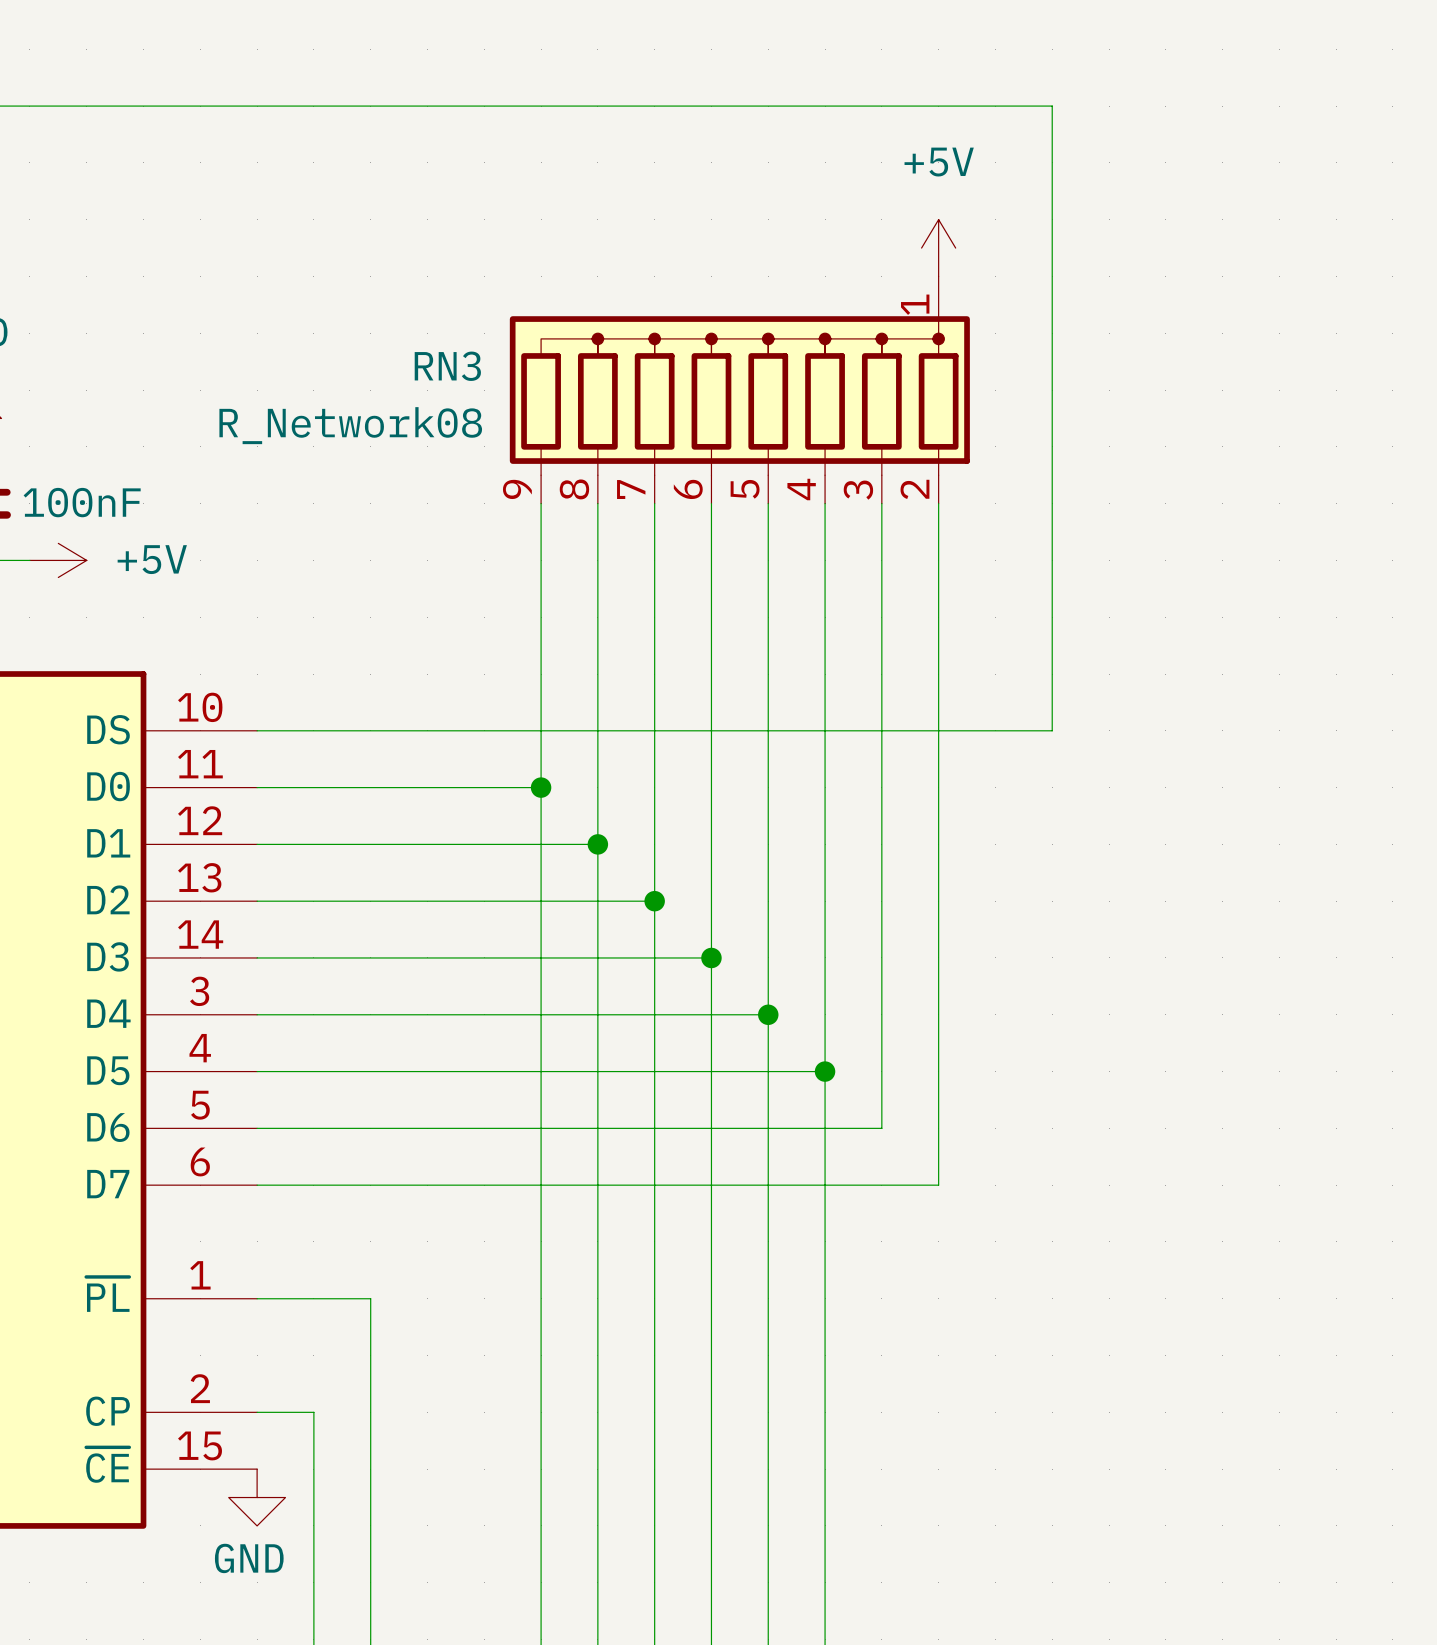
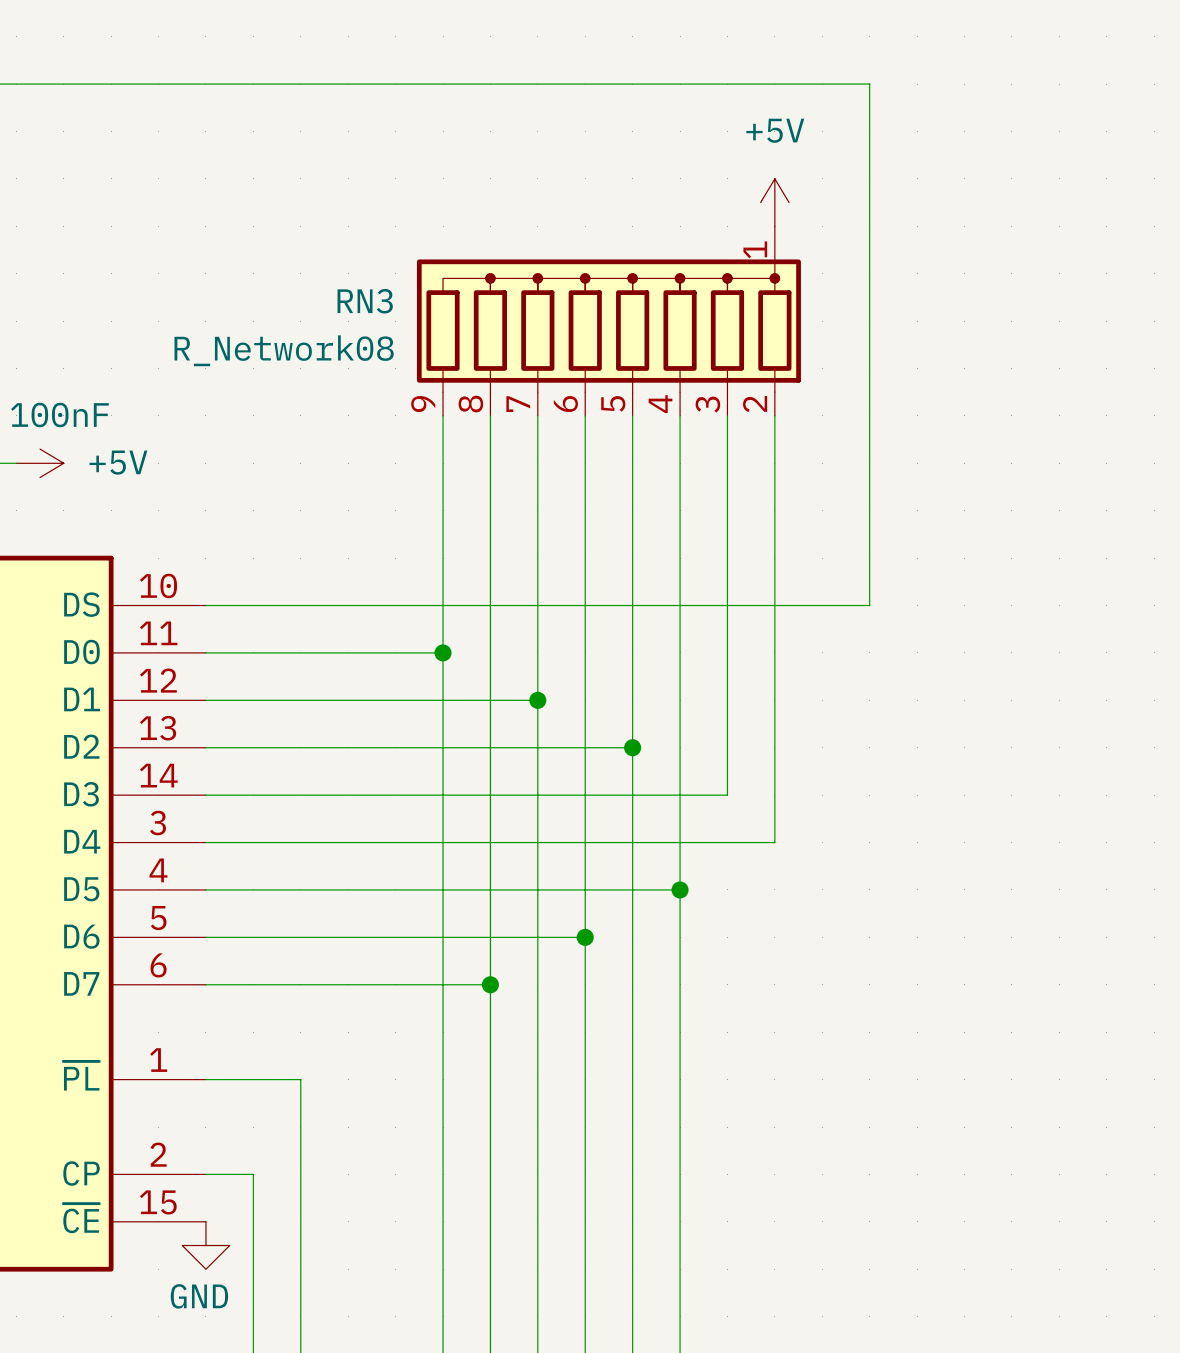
wire: none -> (490, 700) (537, 700)
junction: (597, 844) -> none
junction: none -> (537, 700)
wire: none -> (537, 747) (632, 747)
junction: (654, 901) -> none
junction: none -> (632, 747)
junction: (711, 957) -> none
wire: (881, 957) (881, 1128) (711, 1128) -> (727, 795) (585, 795)
junction: (768, 1014) -> none
wire: (938, 1014) (938, 1185) (597, 1185) -> (774, 842) (632, 842)
junction: none -> (585, 937)
junction: none -> (490, 984)

